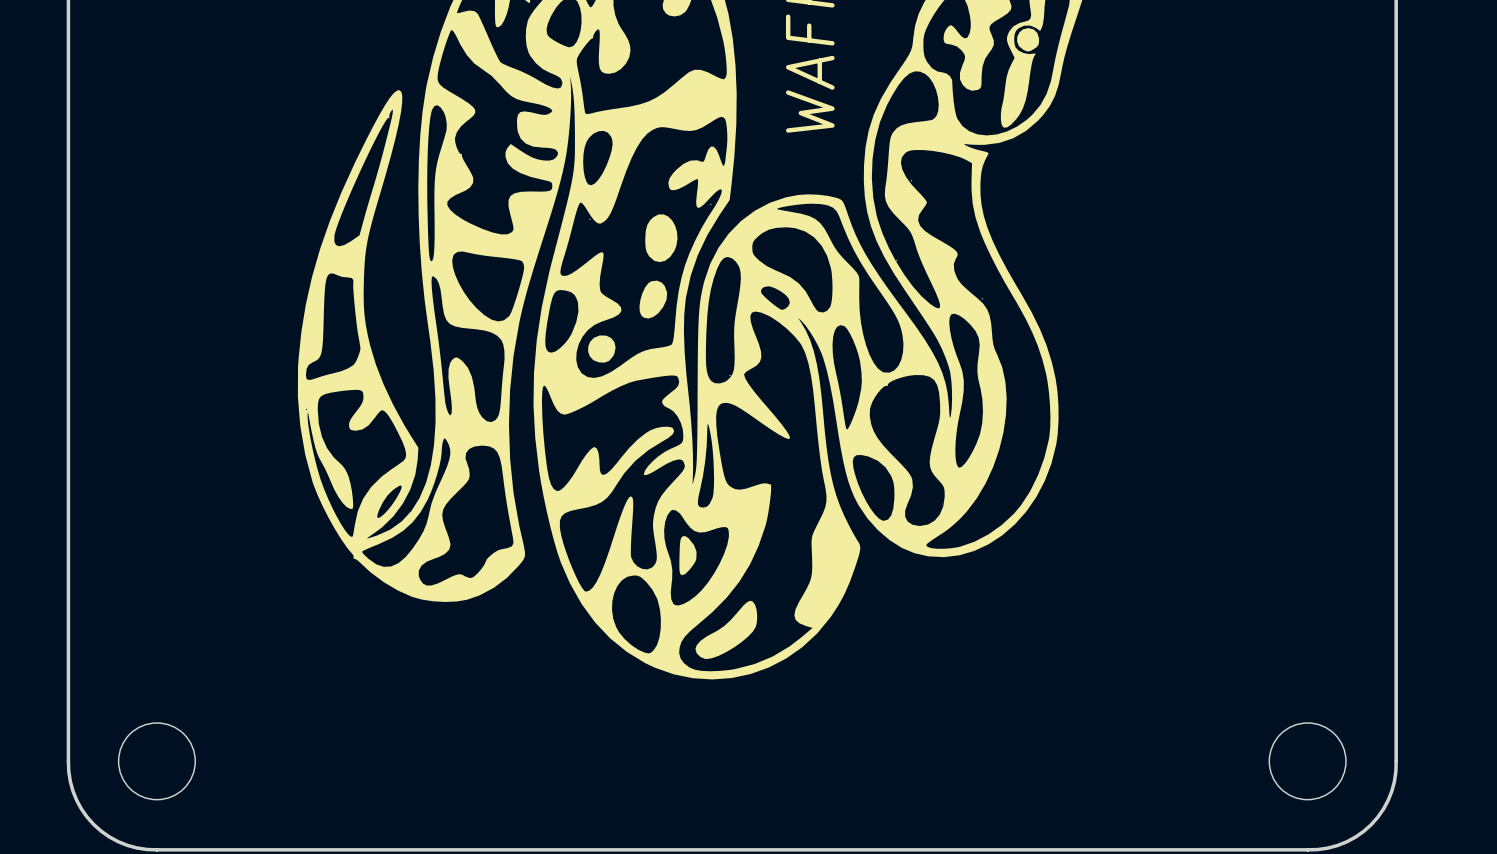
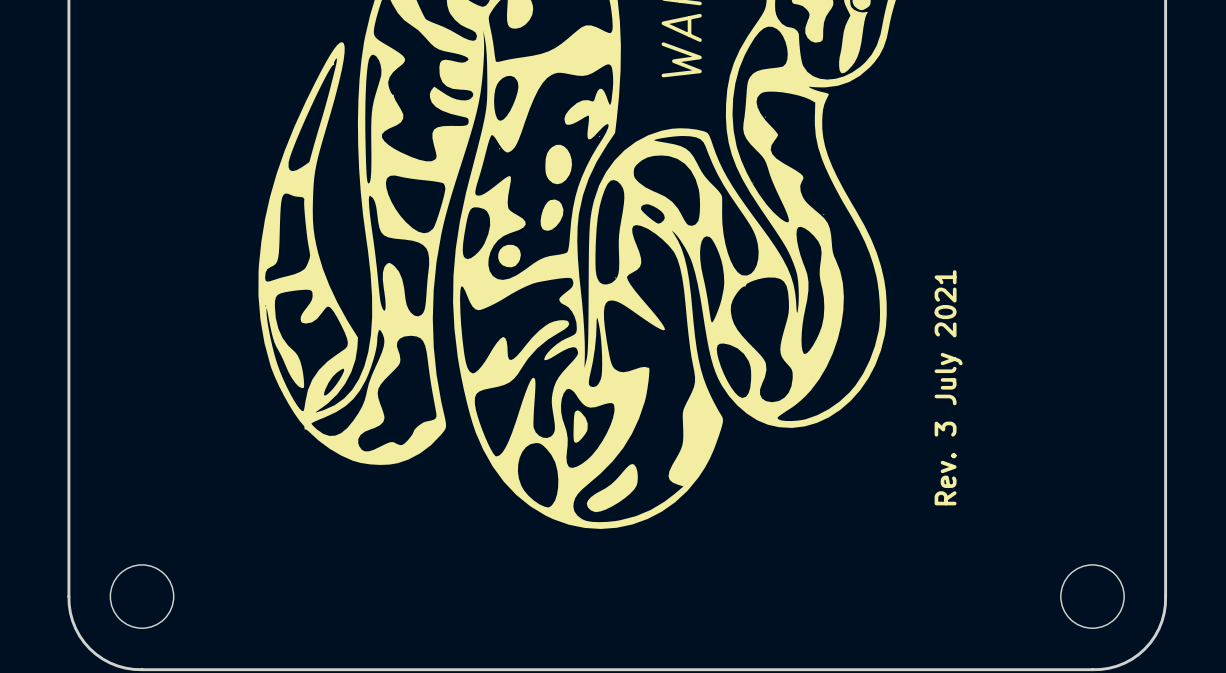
text: none -> Rev. 3 July 2021 (948, 387)

